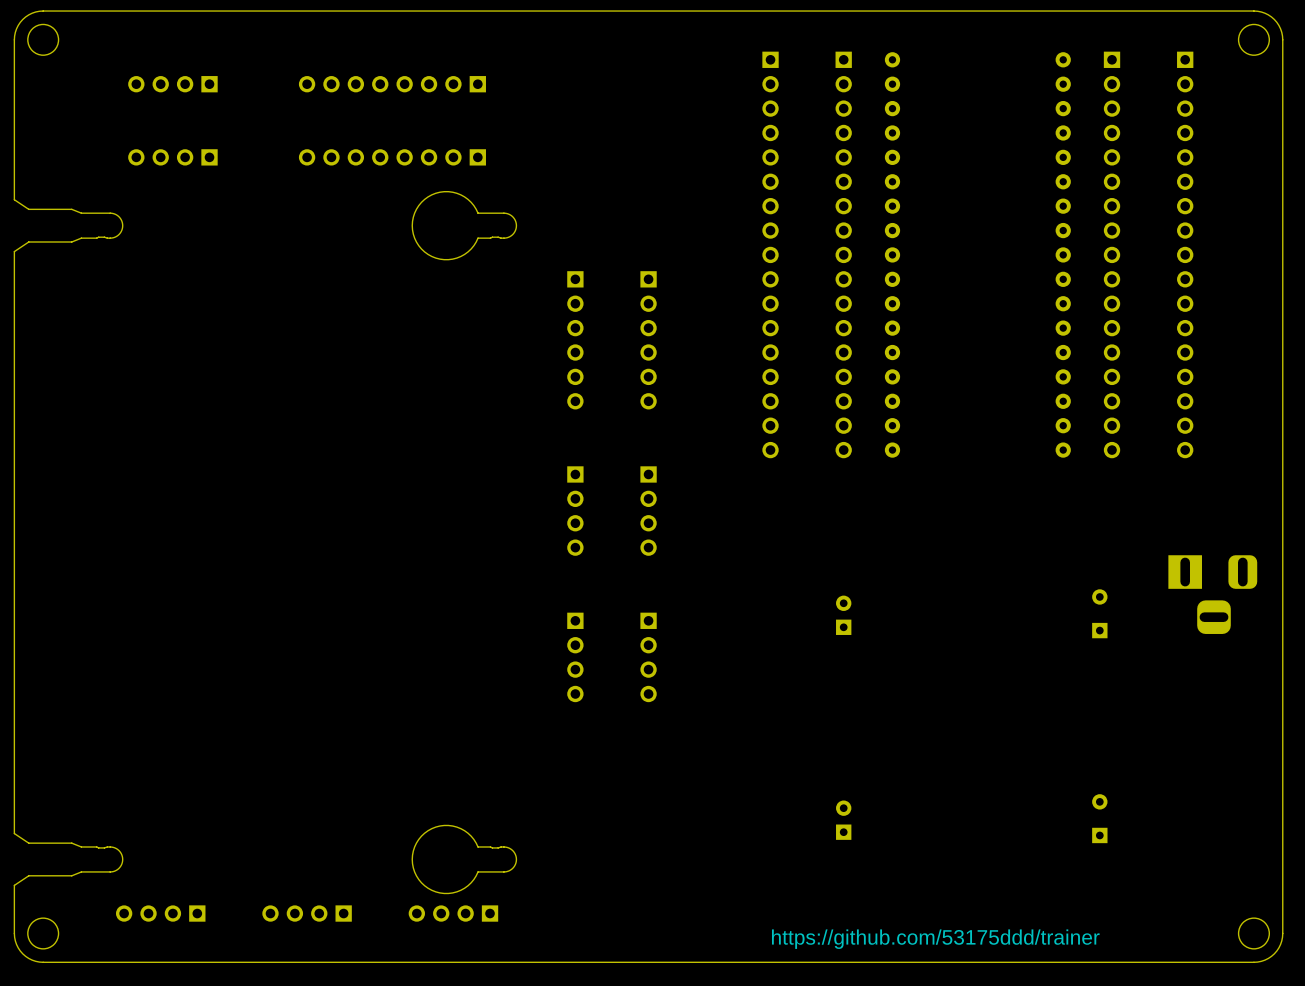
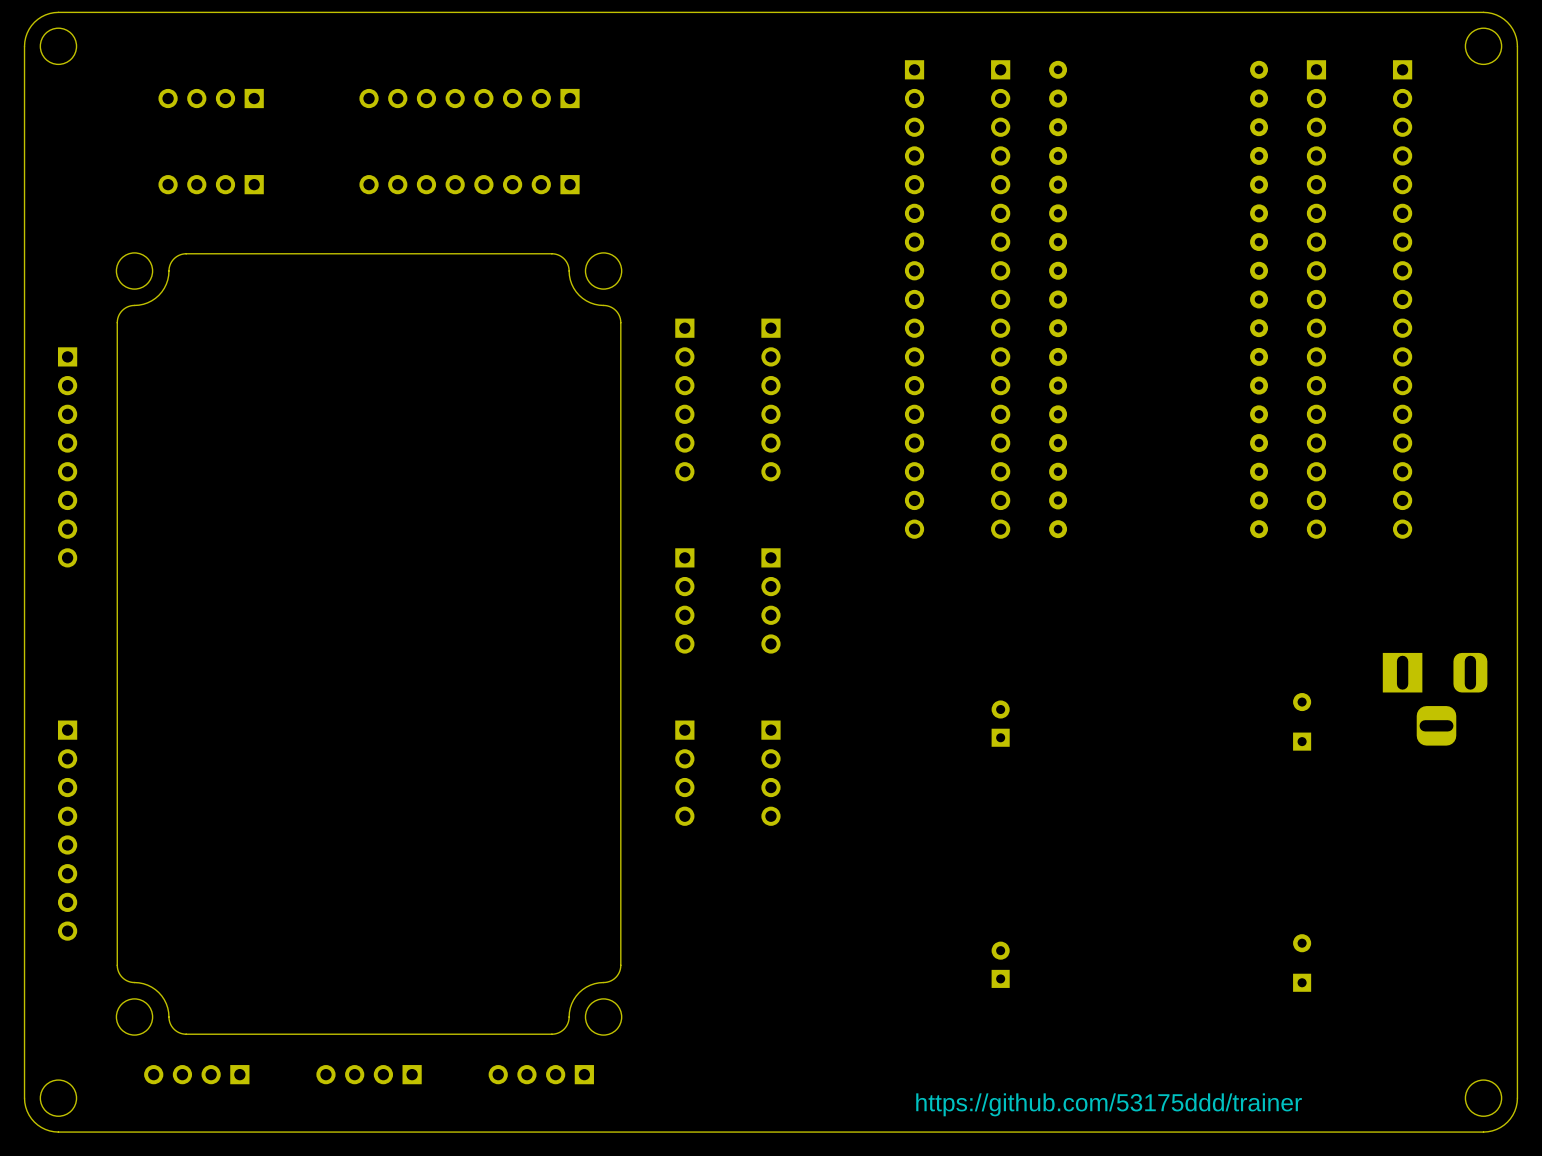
board edge: (14, 199) (28, 209) (71, 209) (81, 213) (113, 213) (120, 218) (122, 225) (120, 232) (113, 237) (81, 238) (71, 242) (28, 242) (14, 251) -> (24, 234) (24, 295)
board edge: (503, 213) (478, 213) (471, 202) (460, 194) (452, 192) (439, 192) (428, 196) (418, 205) (413, 217) (413, 234) (418, 245) (428, 254) (439, 259) (452, 259) (468, 251) (478, 238) (505, 238) (512, 235) (516, 228) (515, 221) (511, 215) (503, 213) -> none
round board edge: none -> [116, 252, 153, 290]
round board edge: none -> [585, 252, 622, 290]
board edge: none -> (551, 253) (184, 253) (177, 256) (171, 261) (166, 284) (158, 295) (147, 302) (127, 307) (118, 315) (117, 322) (117, 967) (119, 974) (125, 979) (147, 985) (158, 992) (166, 1003) (170, 1024) (178, 1032) (186, 1034) (553, 1034) (561, 1031) (566, 1026) (571, 1003) (579, 992) (590, 985) (611, 980) (619, 972) (620, 965) (620, 320) (618, 313) (612, 308) (590, 302) (579, 295) (571, 284) (566, 261) (561, 256) (551, 253)
part: none -> (67, 457)
part: none -> (67, 830)
board edge: (14, 833) (28, 843) (71, 843) (81, 846) (113, 847) (119, 851) (122, 859) (119, 867) (113, 871) (81, 871) (71, 875) (28, 875) (14, 885) -> (24, 980) (24, 1041)
board edge: (503, 846) (478, 846) (471, 836) (464, 830) (452, 826) (439, 826) (428, 830) (416, 843) (412, 855) (413, 867) (418, 879) (428, 888) (439, 892) (452, 892) (468, 885) (478, 871) (505, 871) (512, 868) (516, 861) (515, 854) (511, 849) (503, 846) -> none
round board edge: none -> [116, 998, 153, 1036]
round board edge: none -> [585, 998, 622, 1036]

